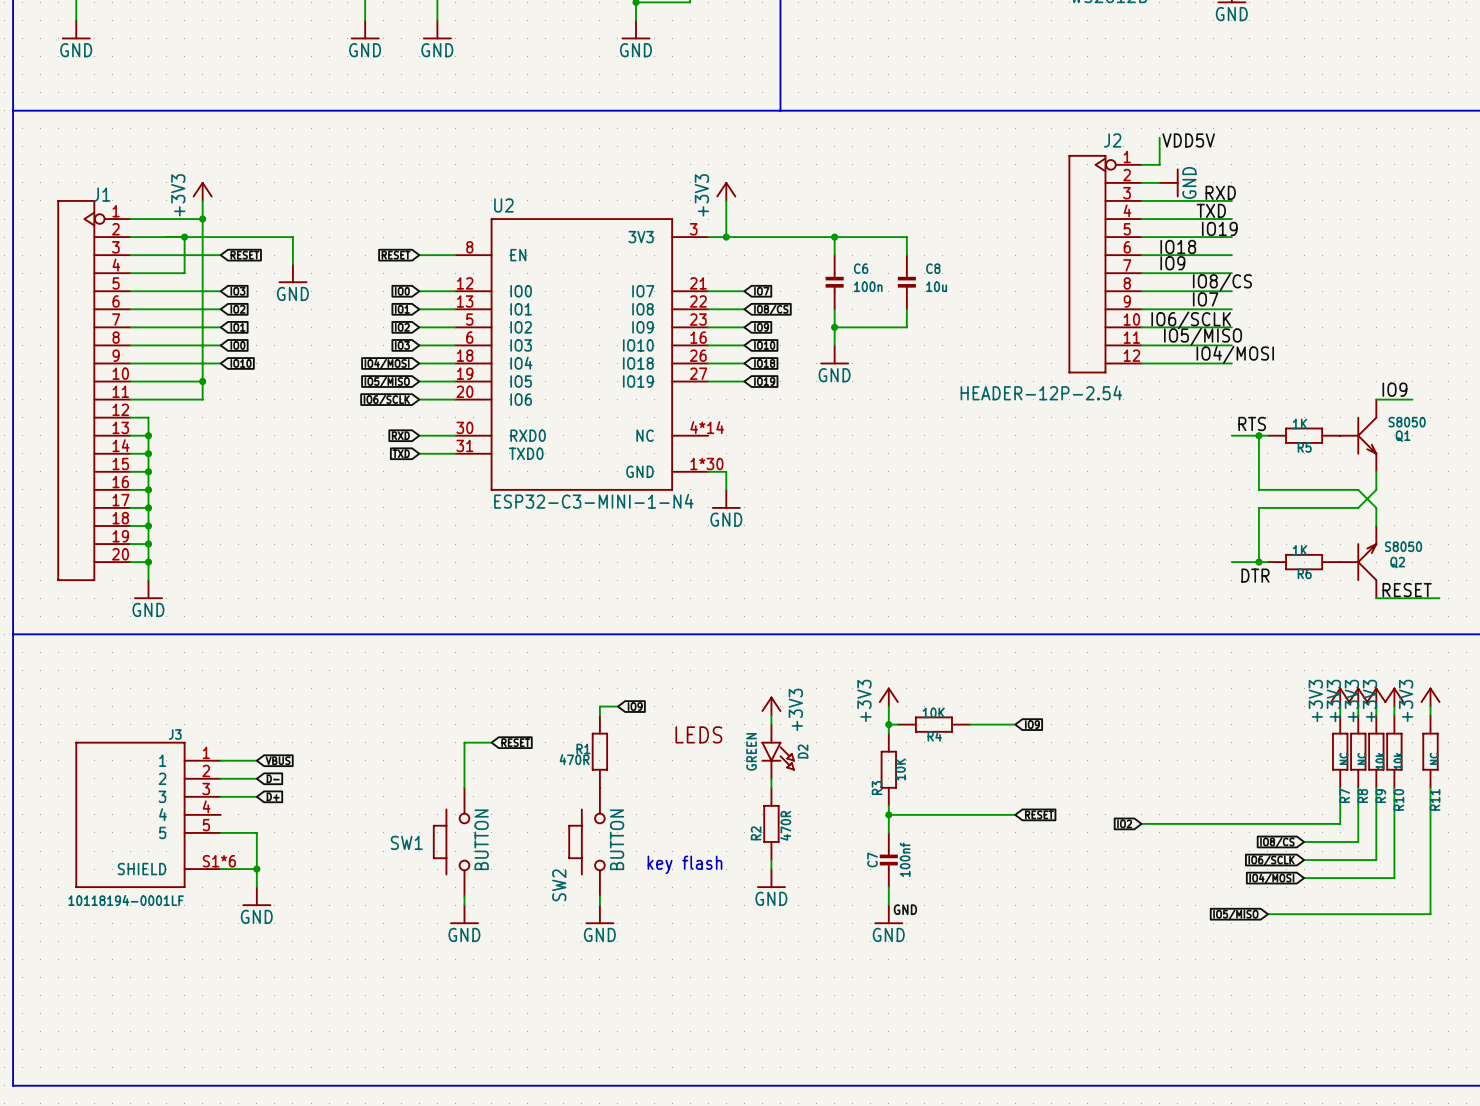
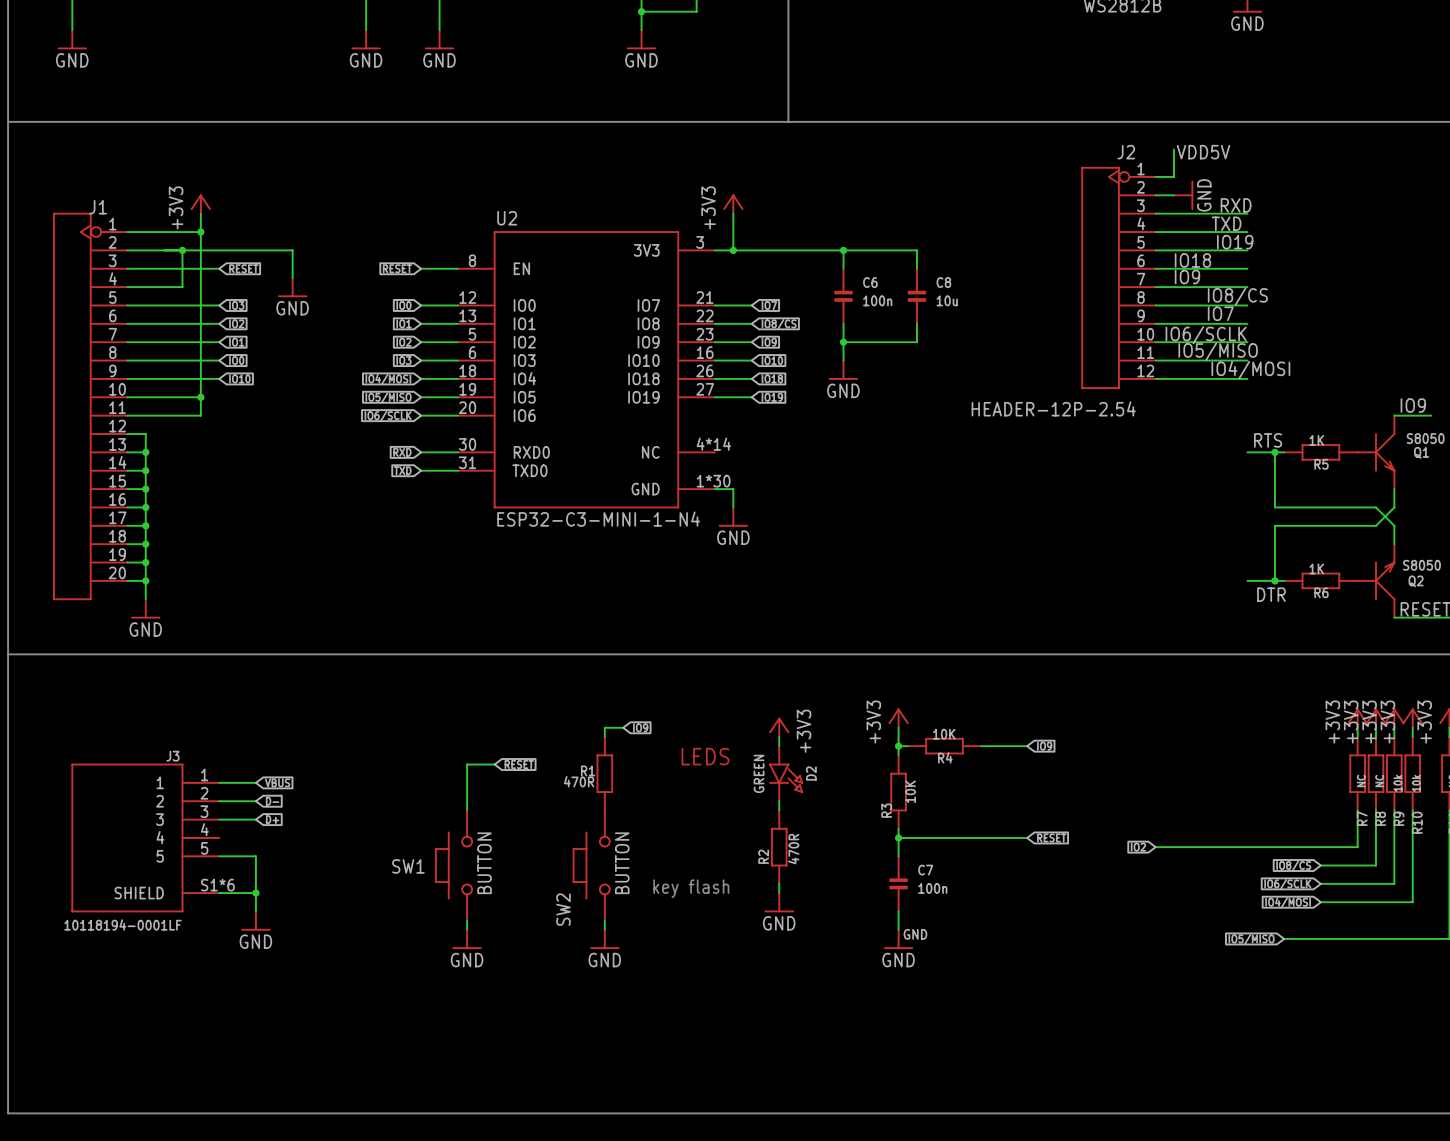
C7 name rotation: 0° (872, 859) -> 90° clockwise (925, 870)
C7 name position: C7 (872, 859) -> C7 (925, 870)
C7 value: 100nf (905, 859) -> 100n (932, 888)

